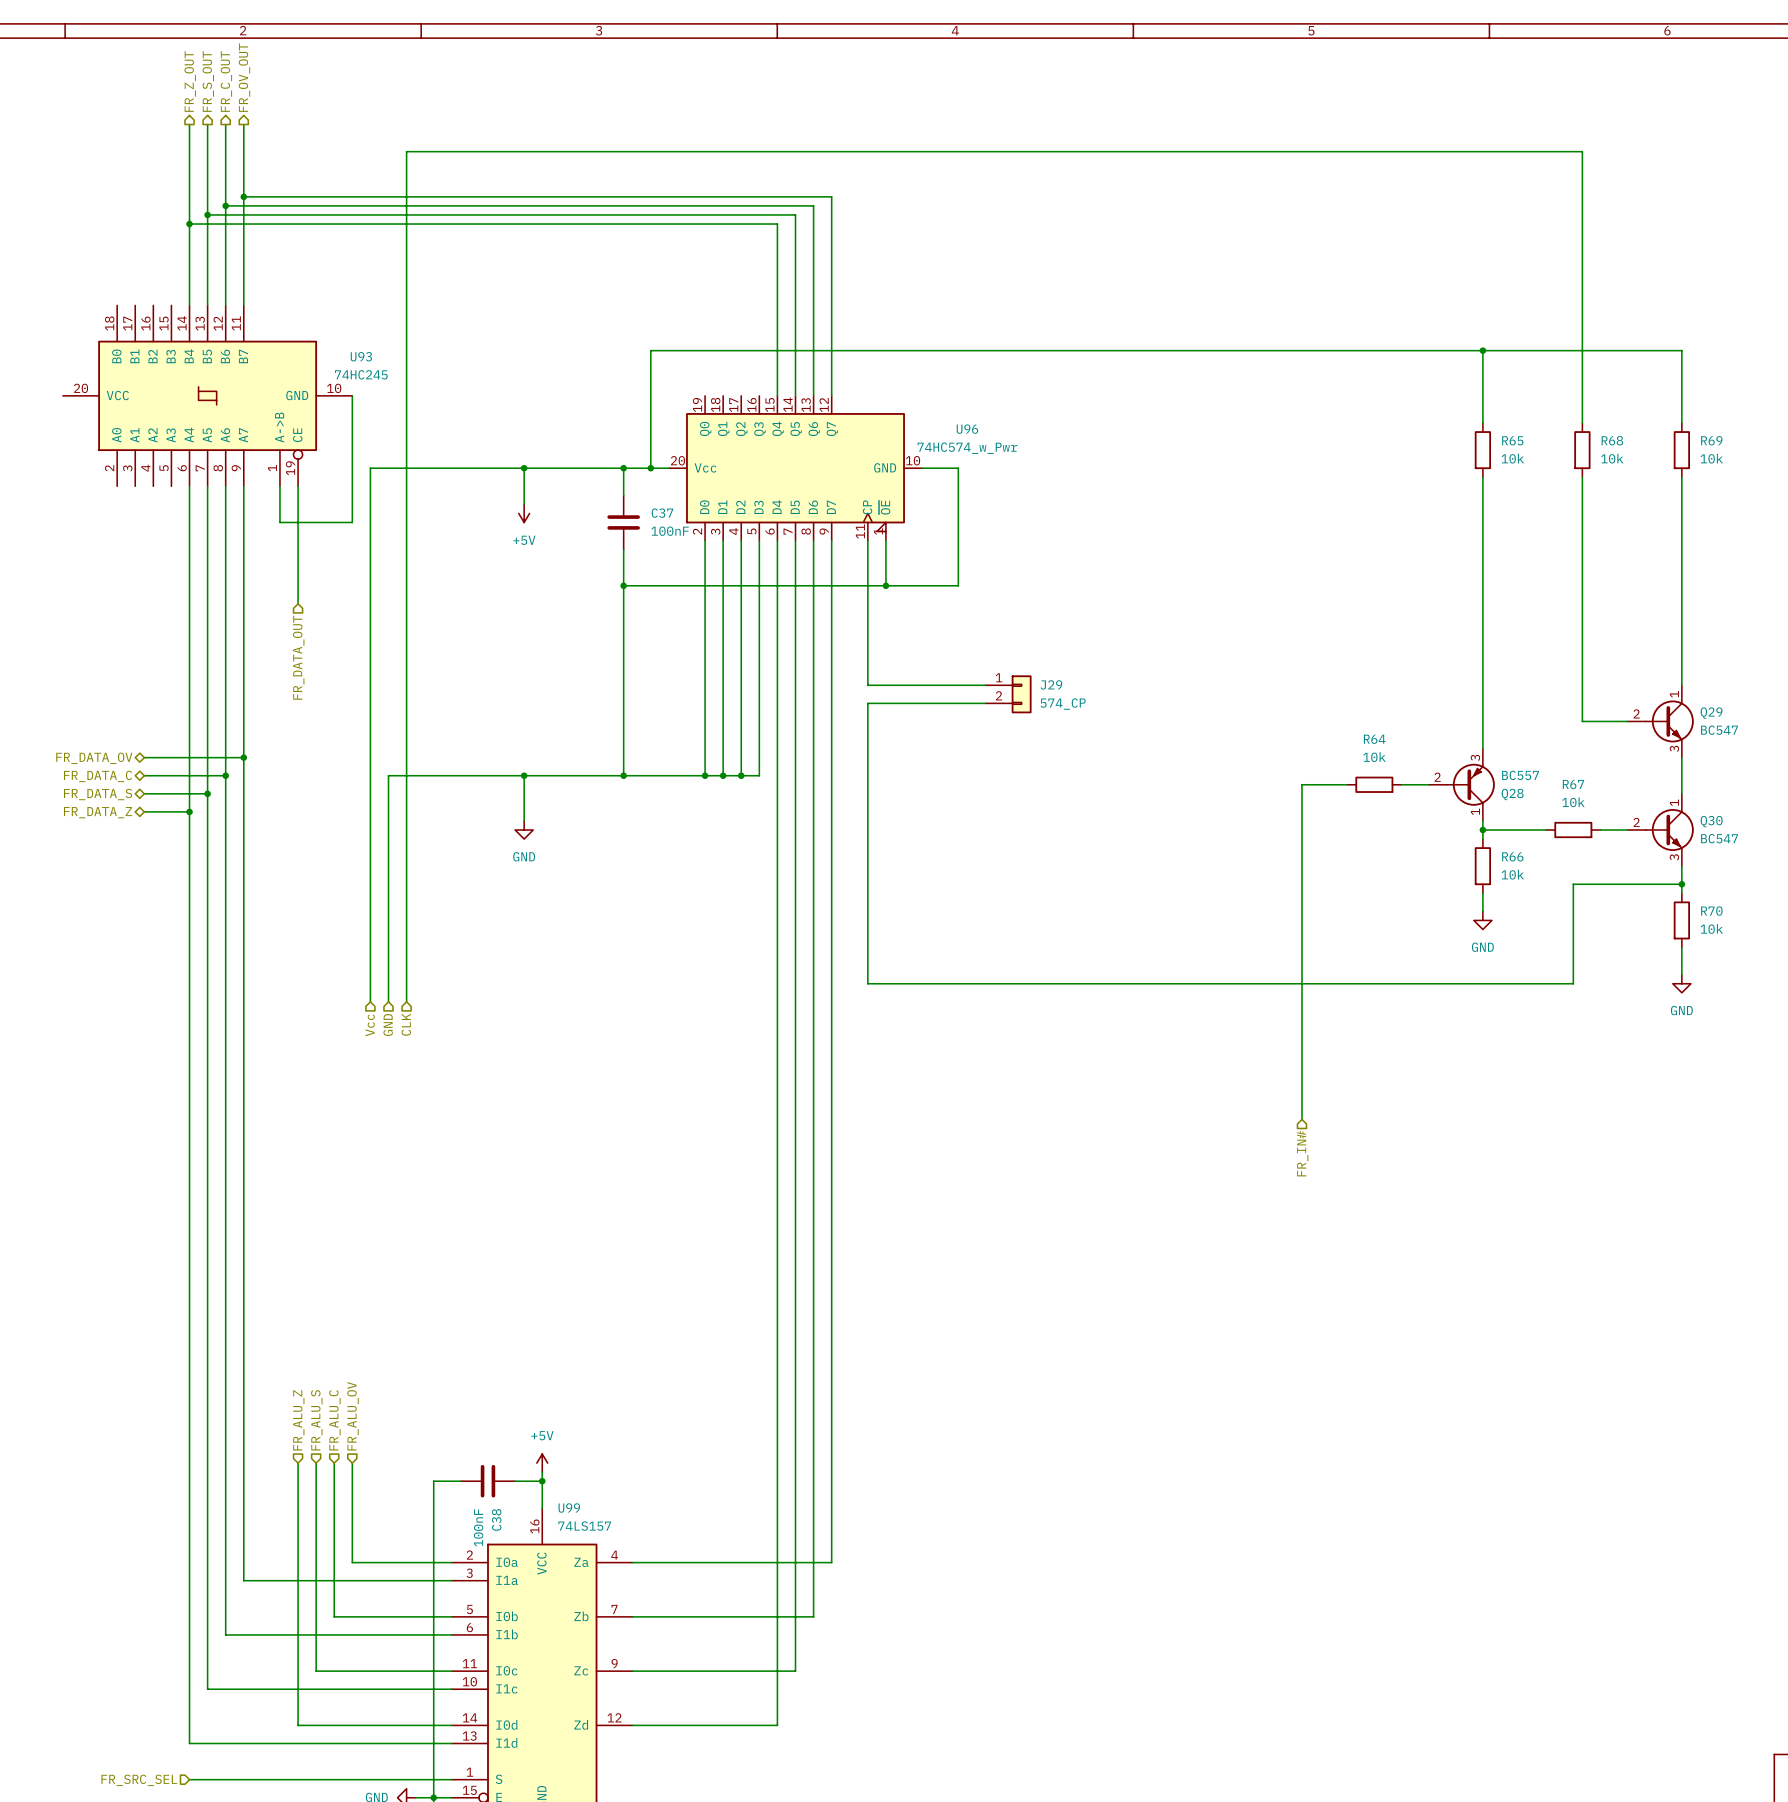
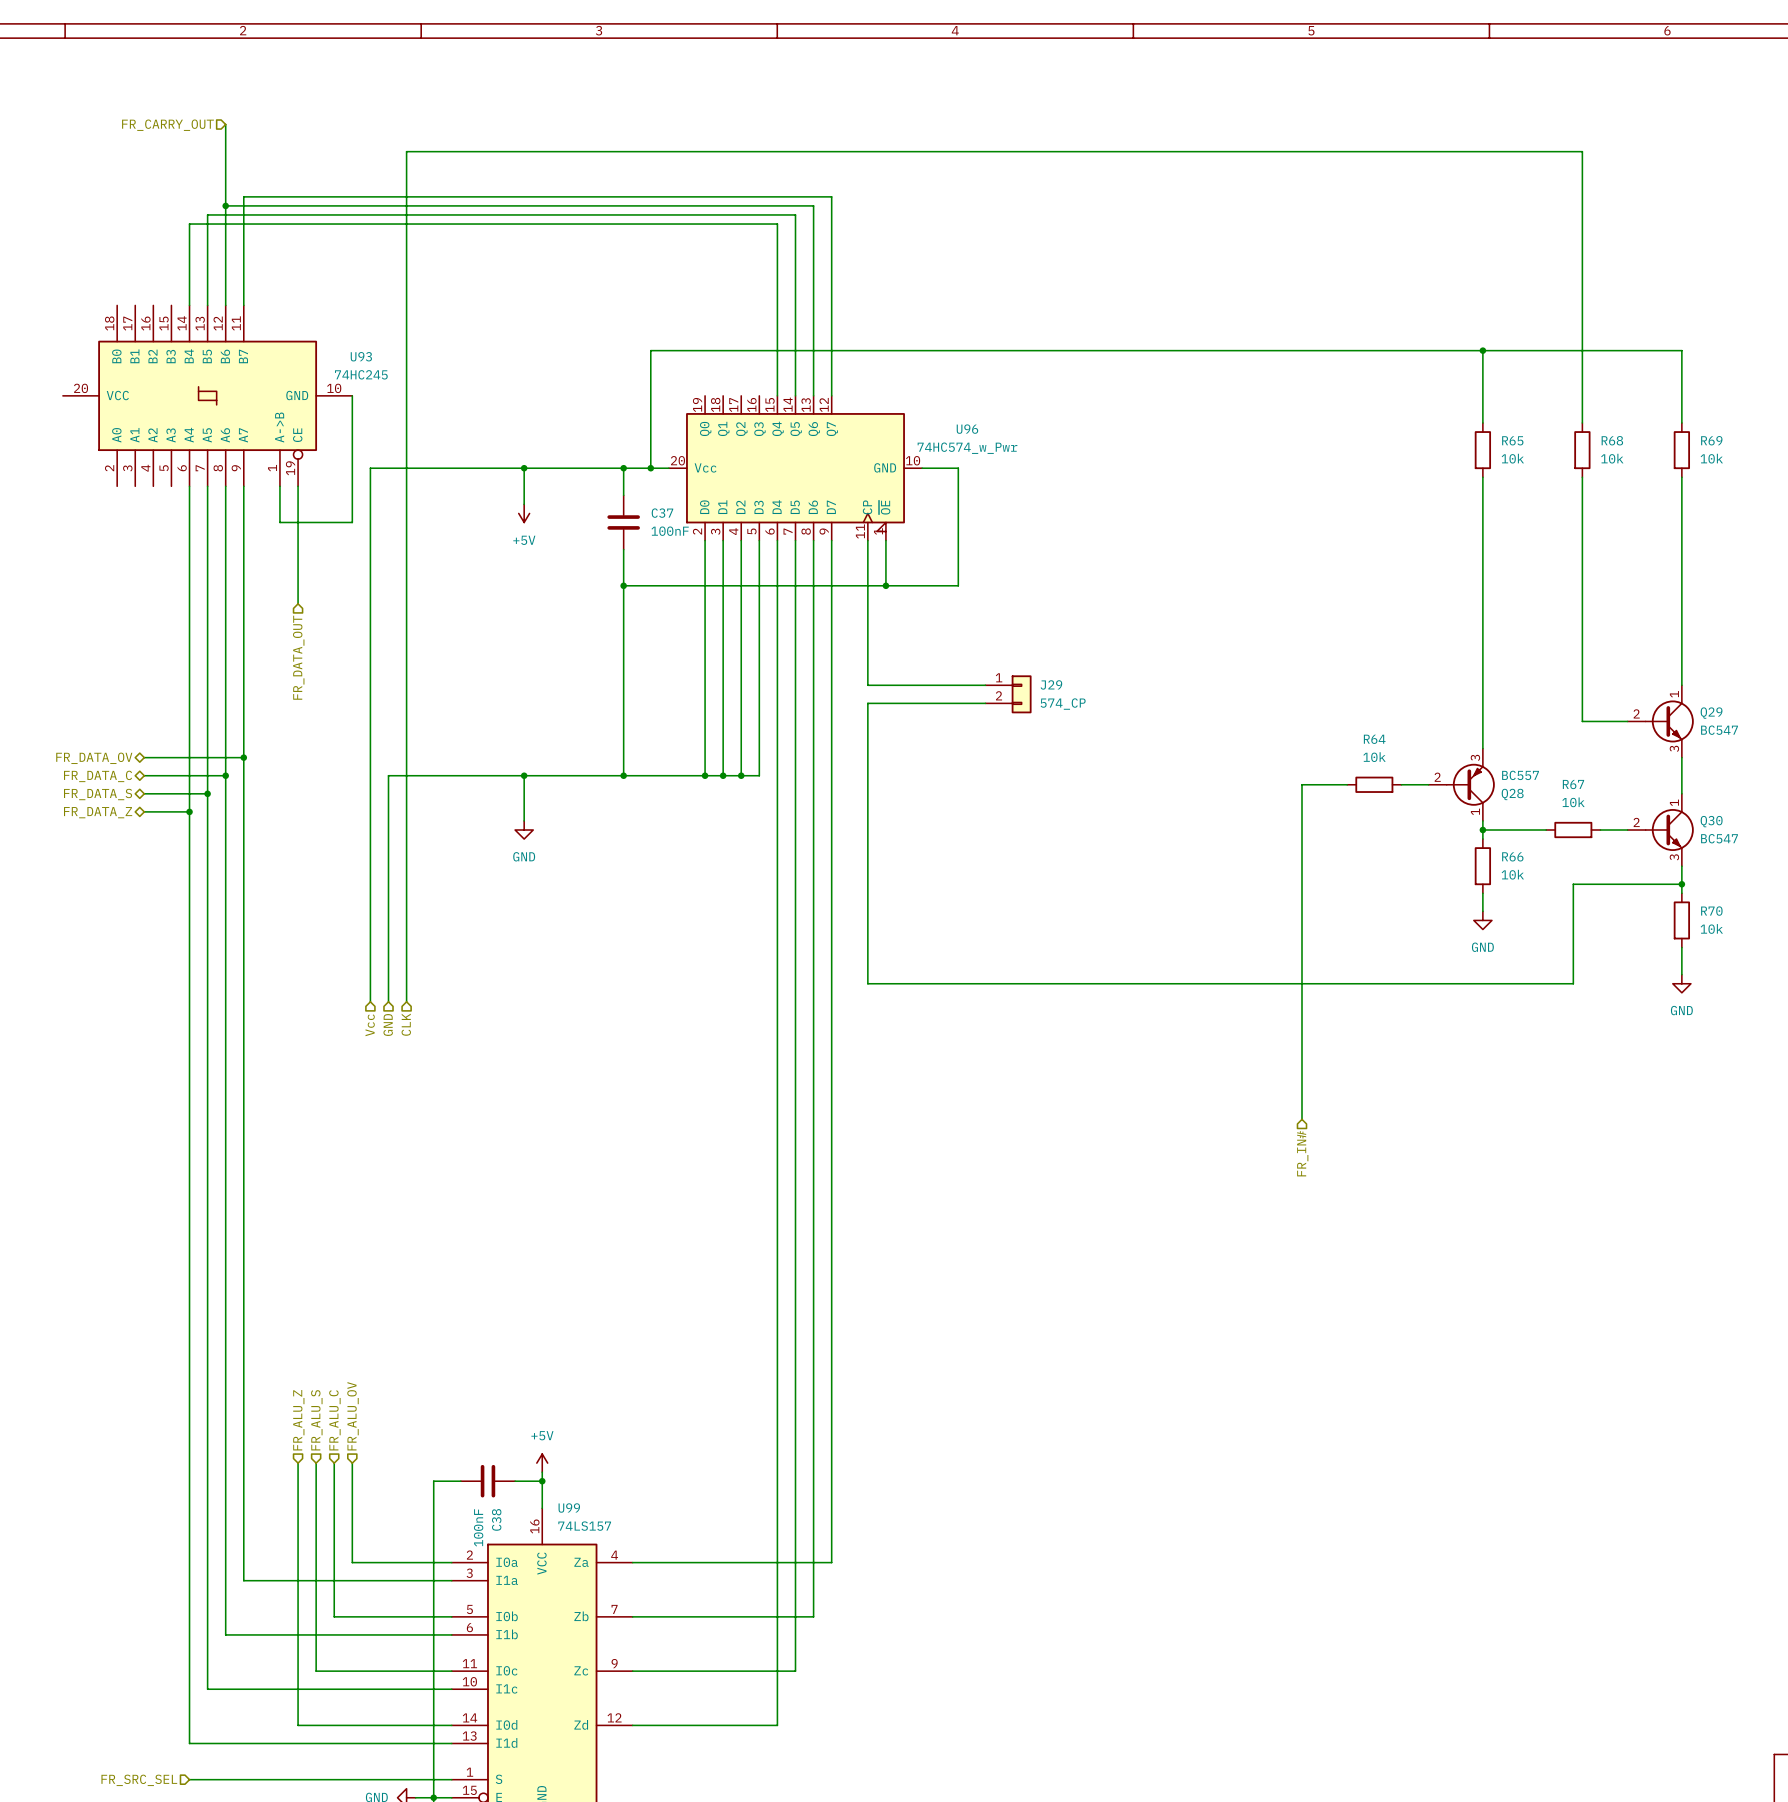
hierarchical label: FR_OV_OUT (244, 77) -> none
hierarchical label: FR_Z_OUT (190, 81) -> none
hierarchical label: FR_S_OUT (208, 81) -> none
hierarchical label: FR_C_OUT (226, 81) -> none
wire: (189, 124) (189, 224) -> none
wire: (207, 124) (207, 214) -> none
wire: (243, 124) (243, 196) -> none
hierarchical label: none -> FR_CARRY_OUT (167, 125)
junction: (243, 196) -> none
junction: (207, 214) -> none
junction: (189, 224) -> none

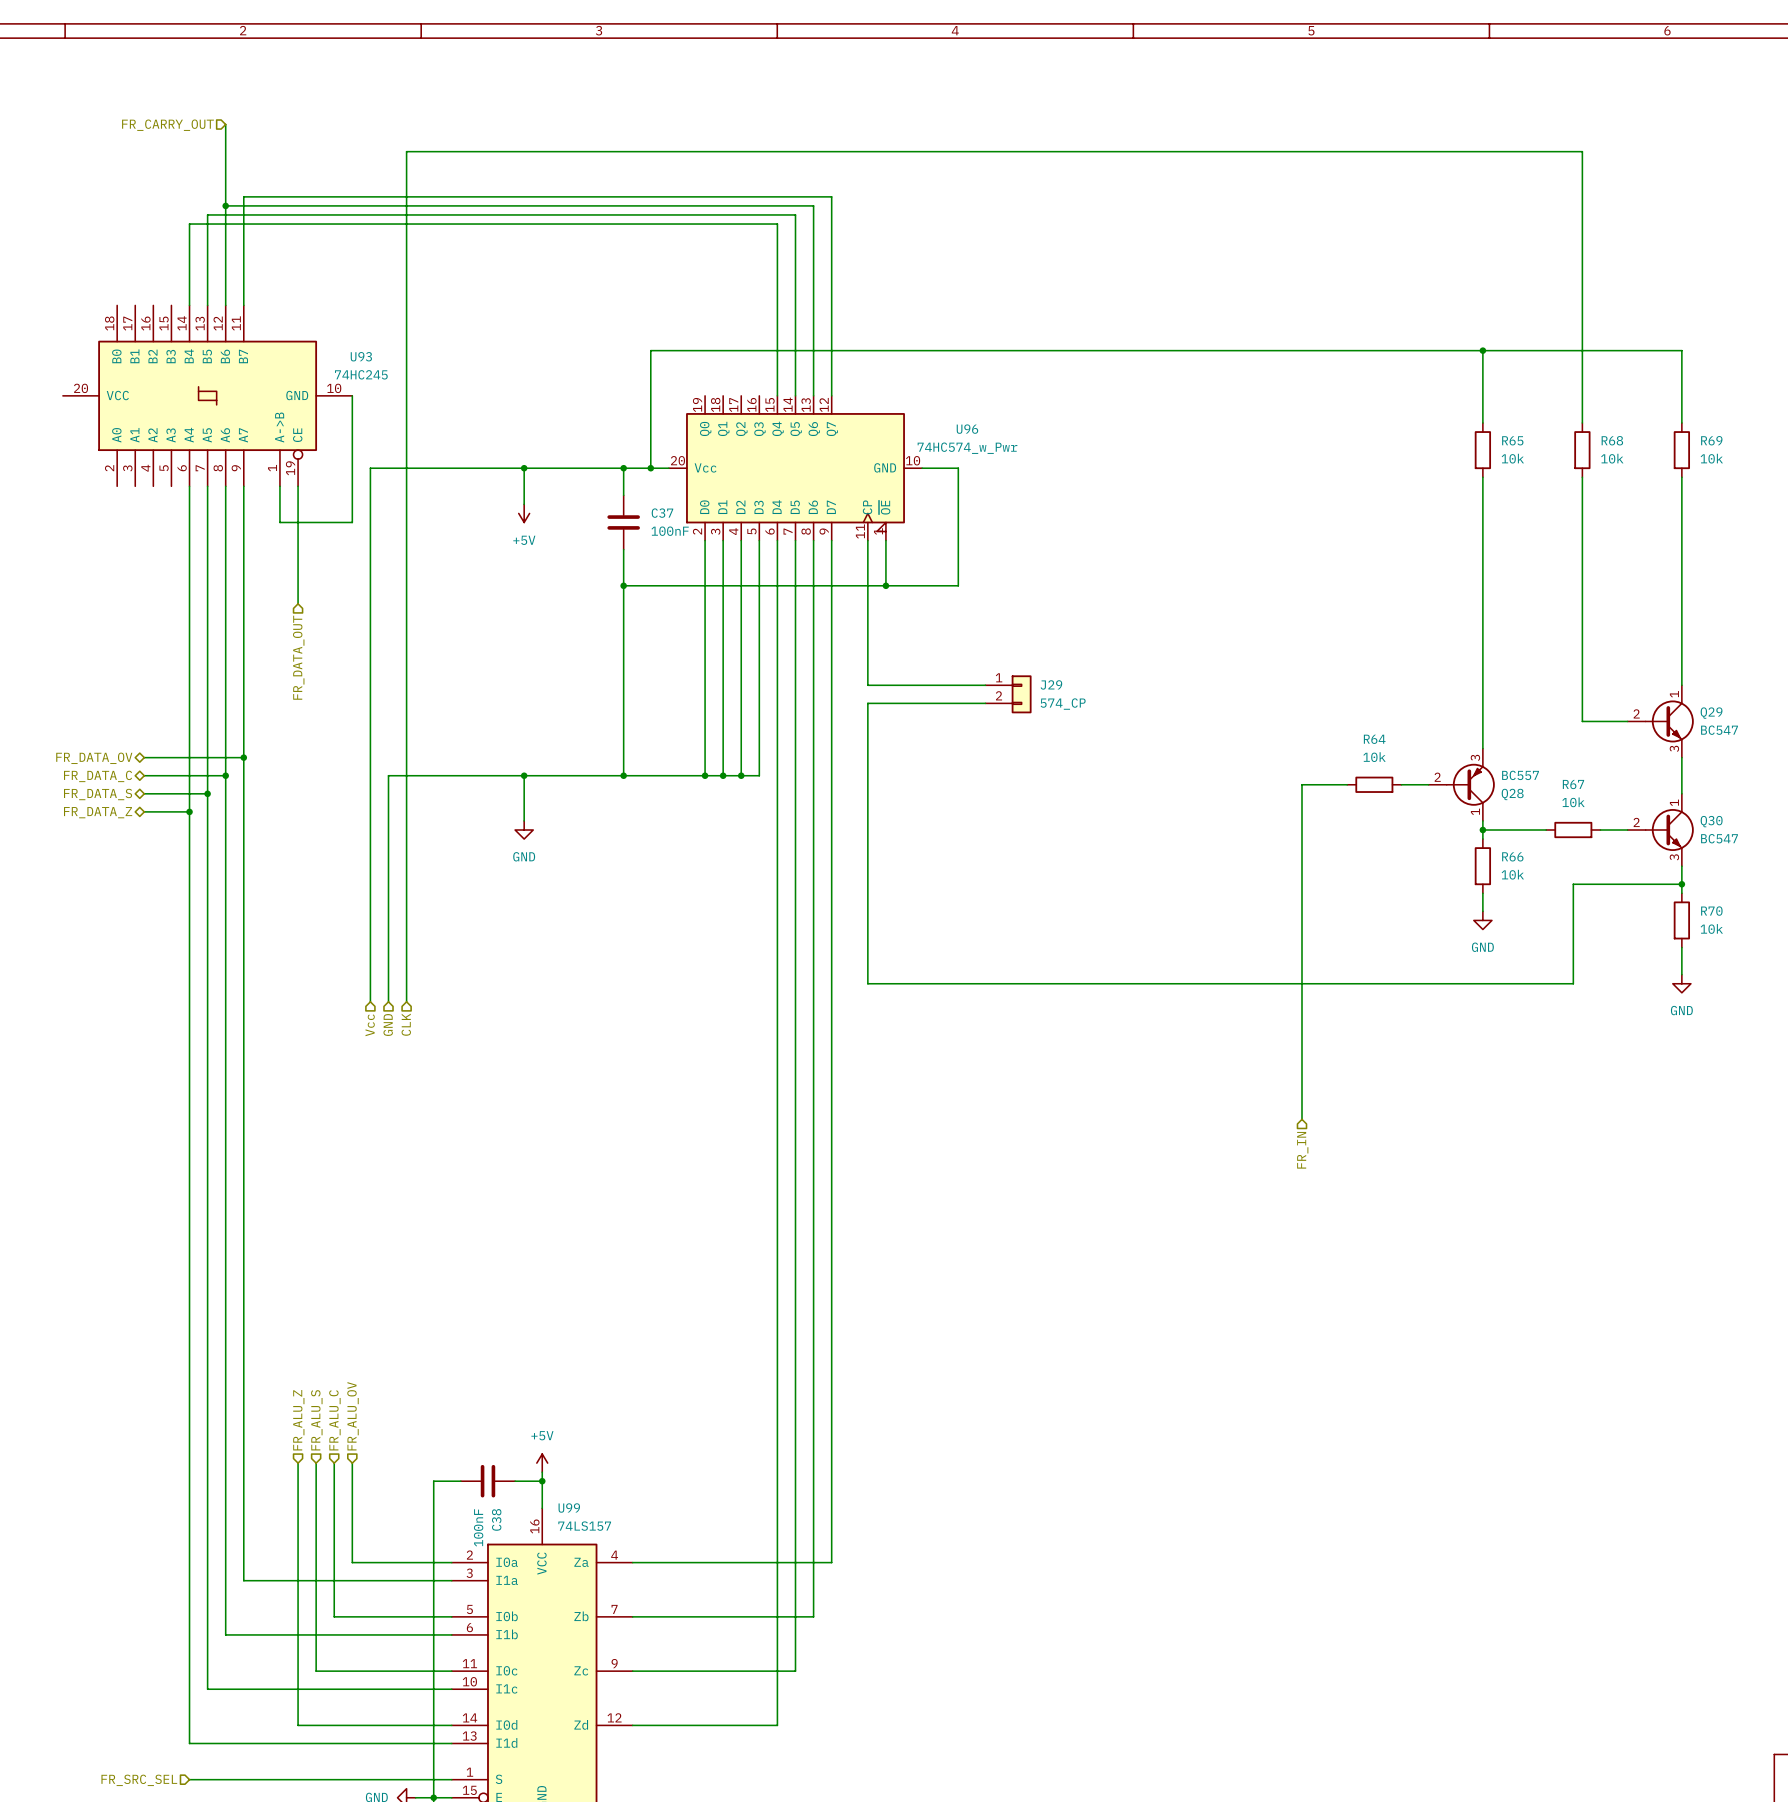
hierarchical label: FR_IN# (1302, 1153) -> FR_IN (1302, 1150)

